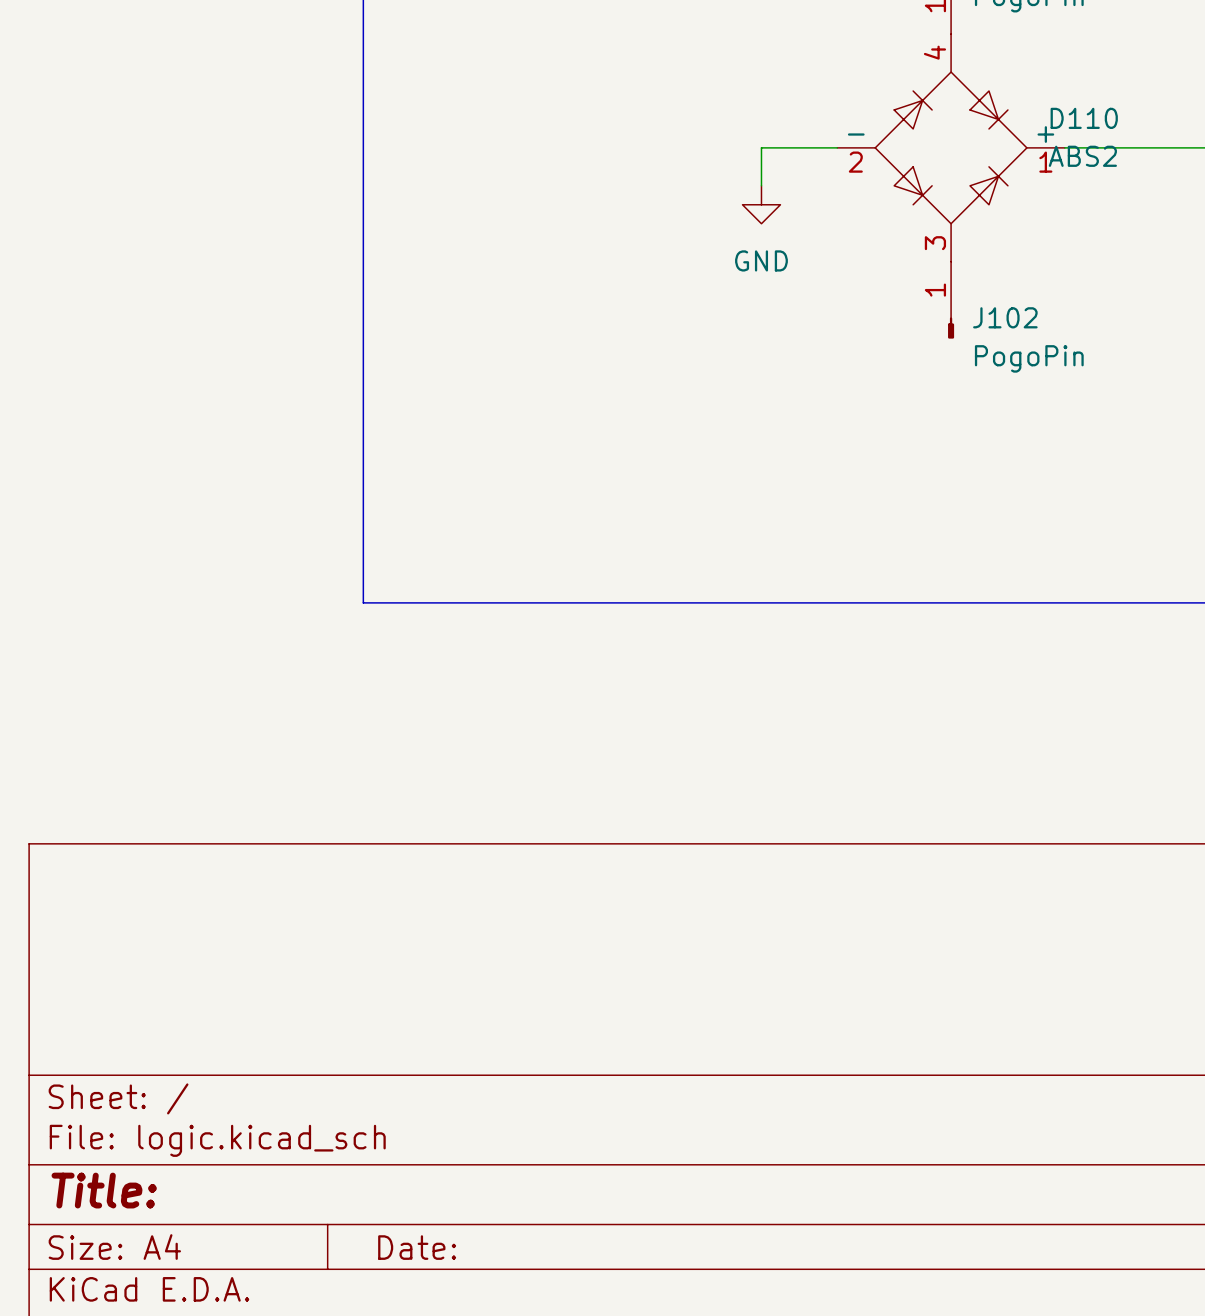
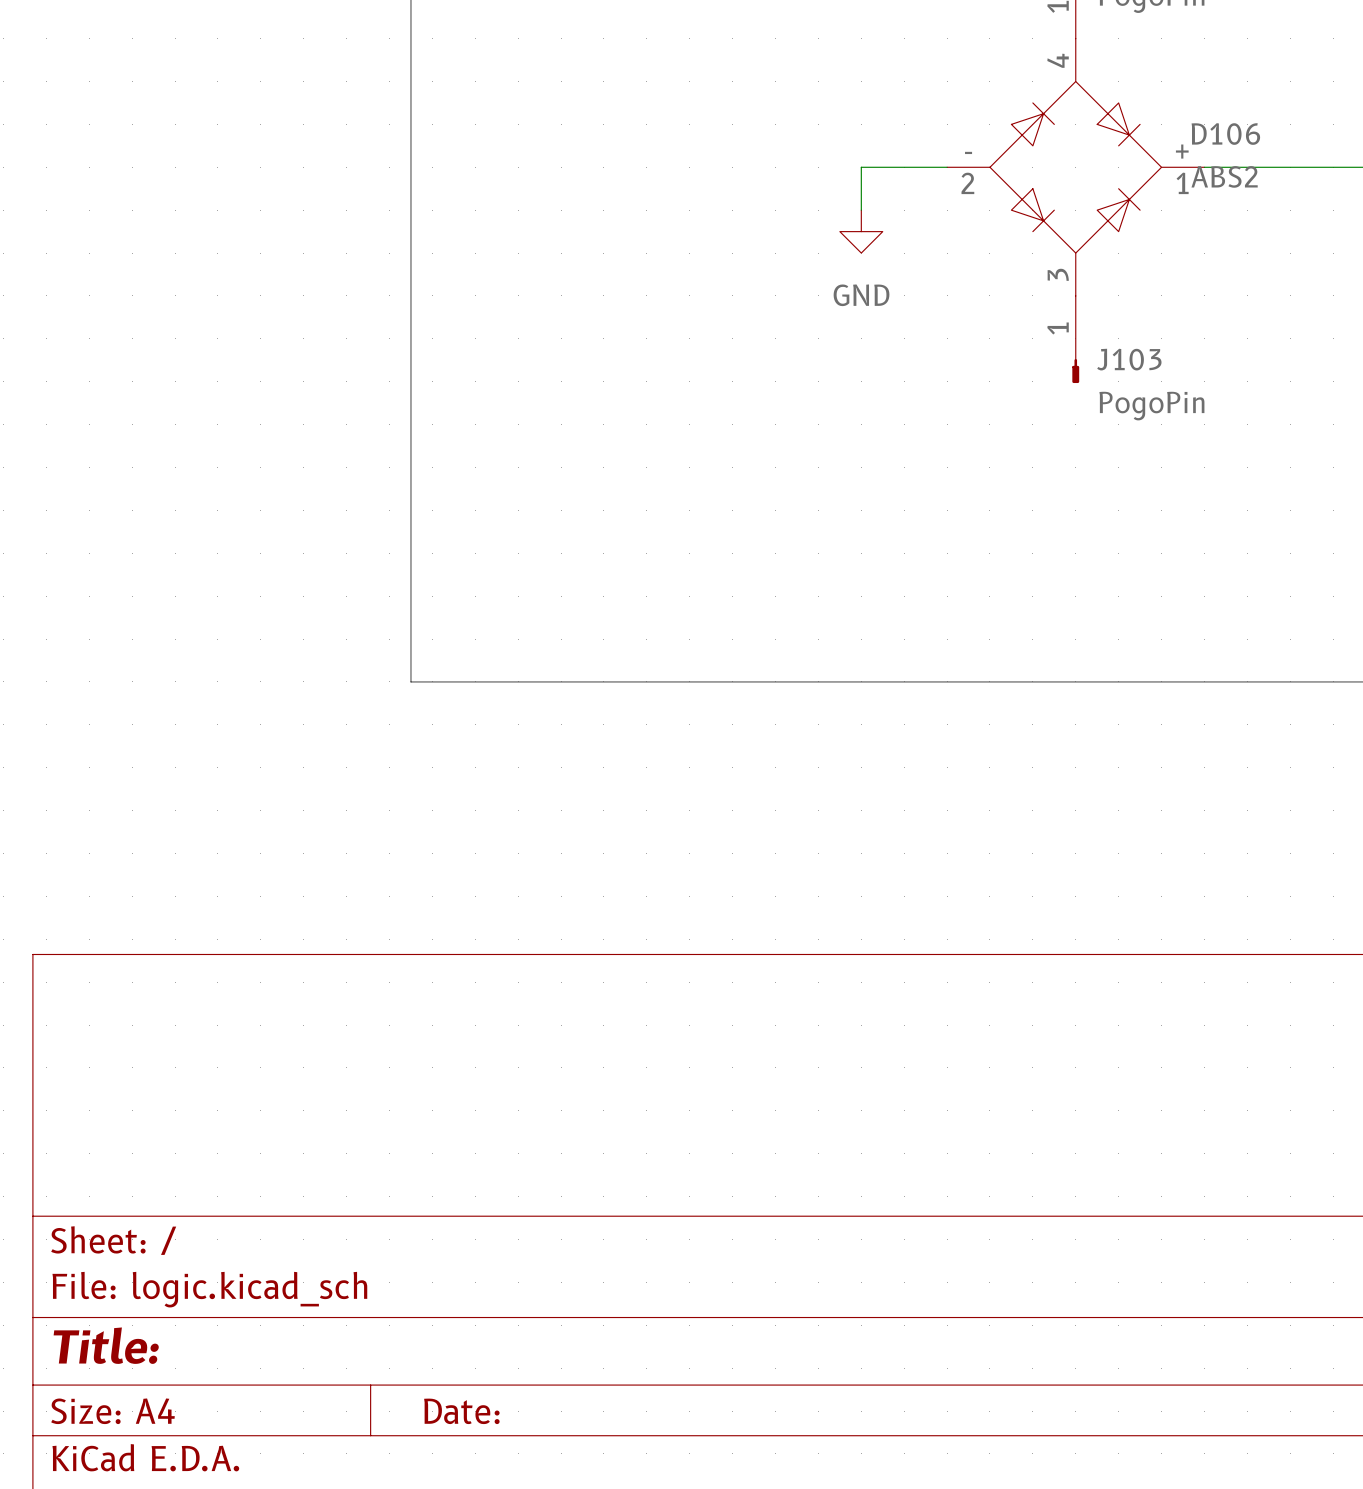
D110 name: D110 (1084, 118) -> D106 (1225, 134)
J102 name: J102 (1005, 317) -> J103 (1129, 359)

